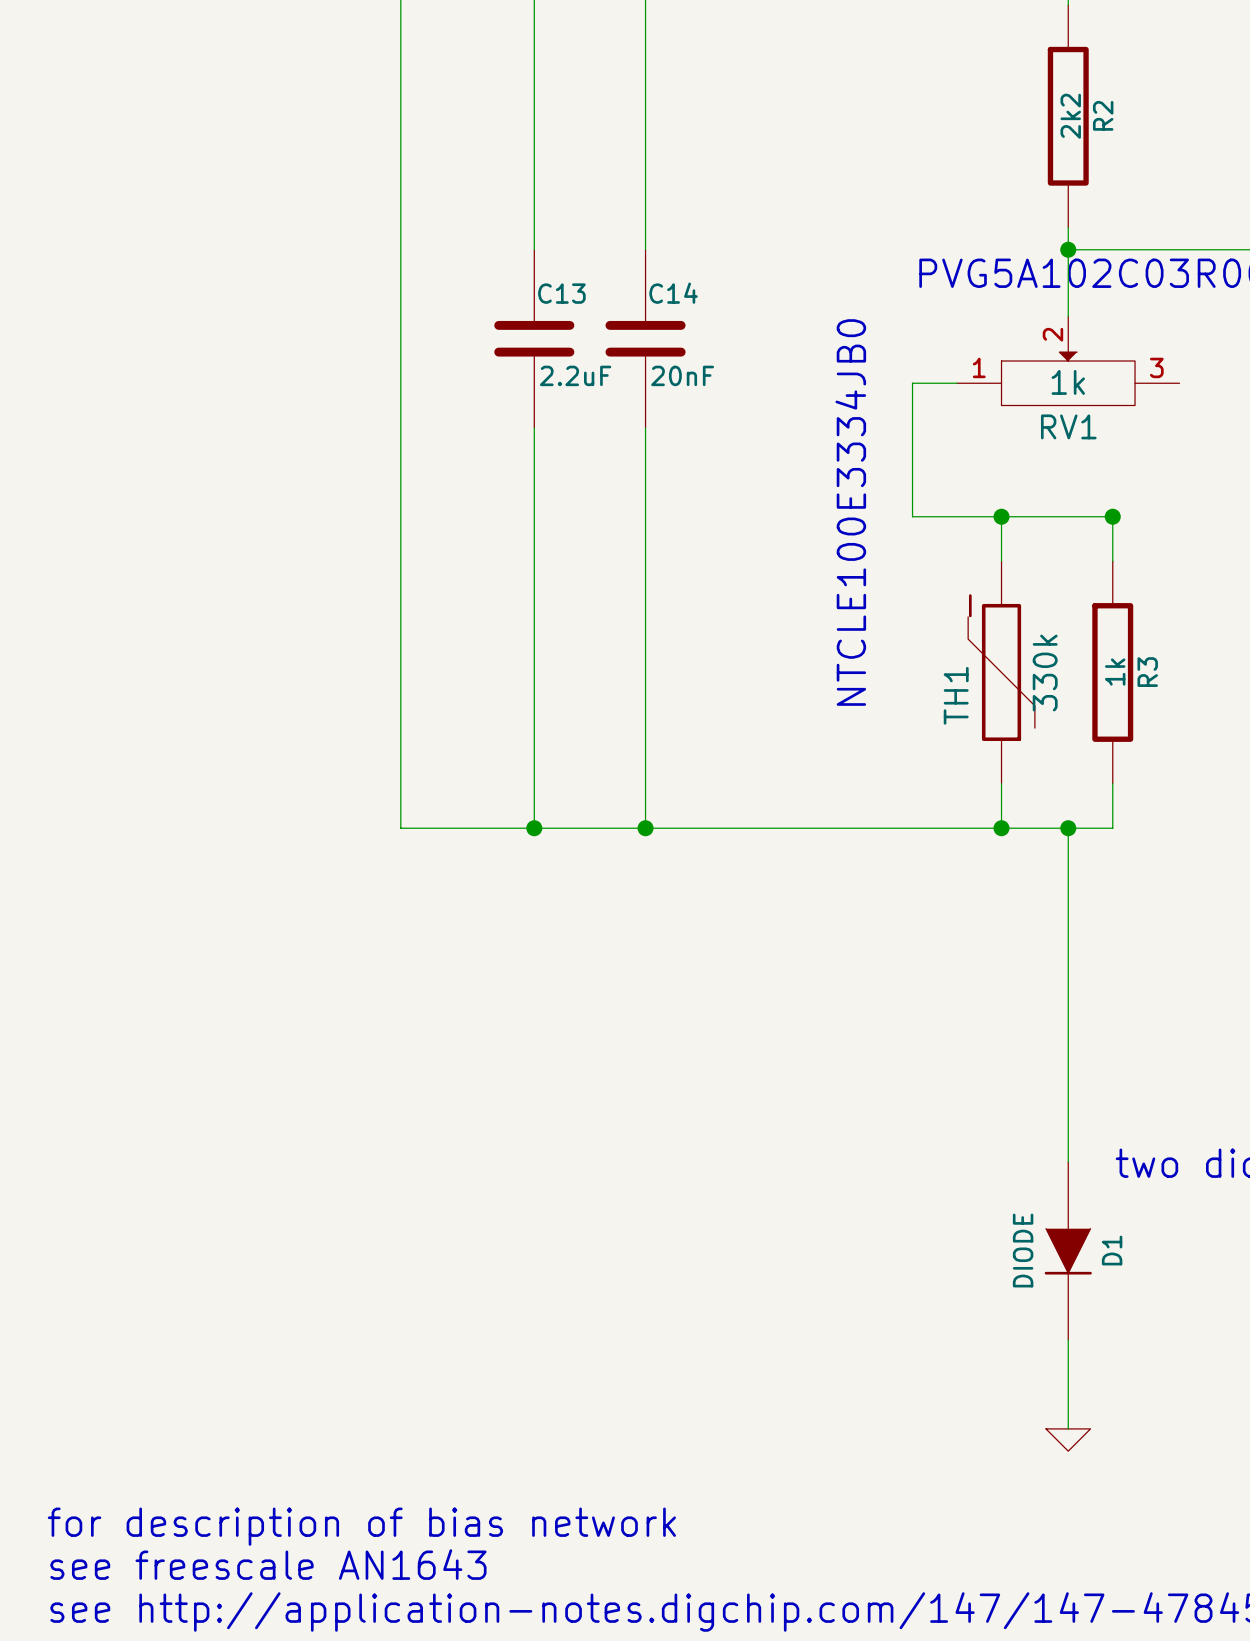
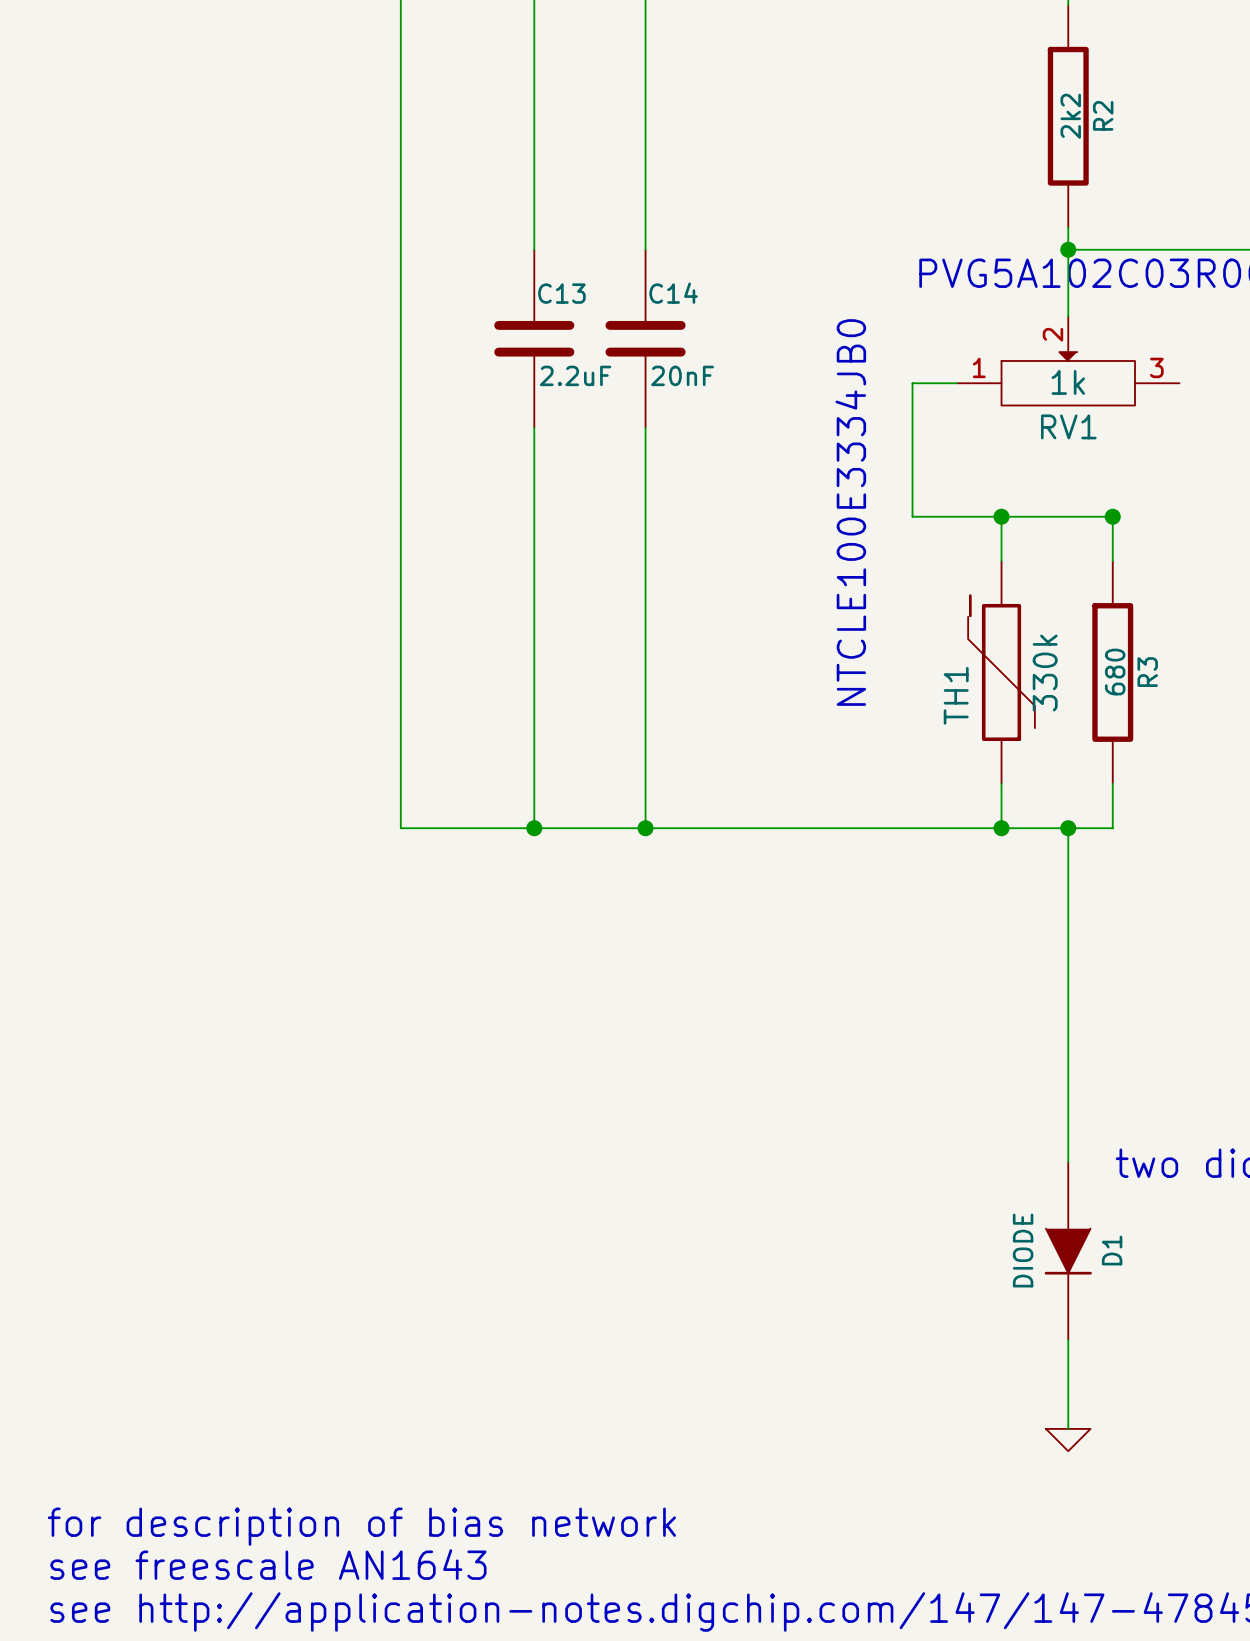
R3 value: 1k (1115, 672) -> 680 (1115, 672)

